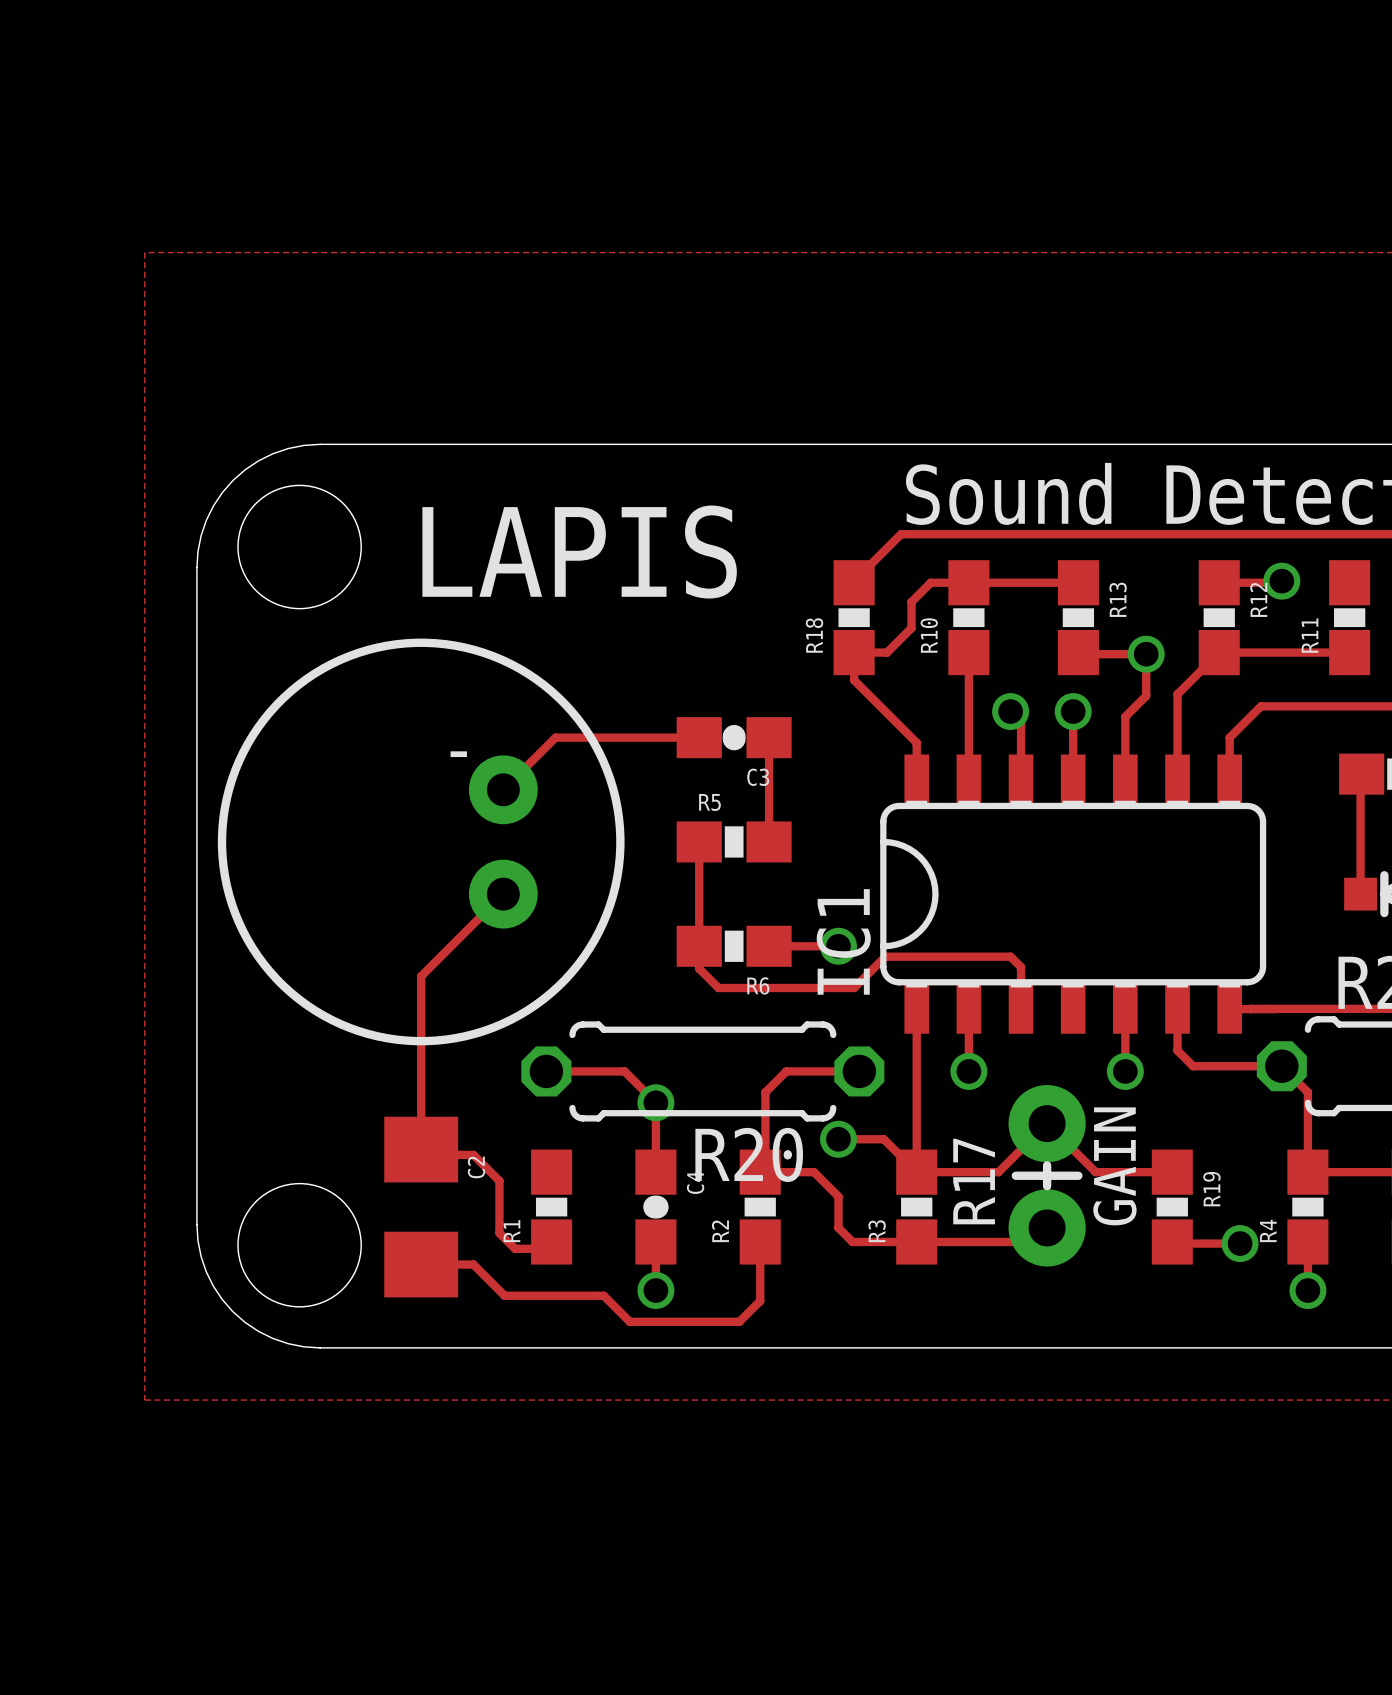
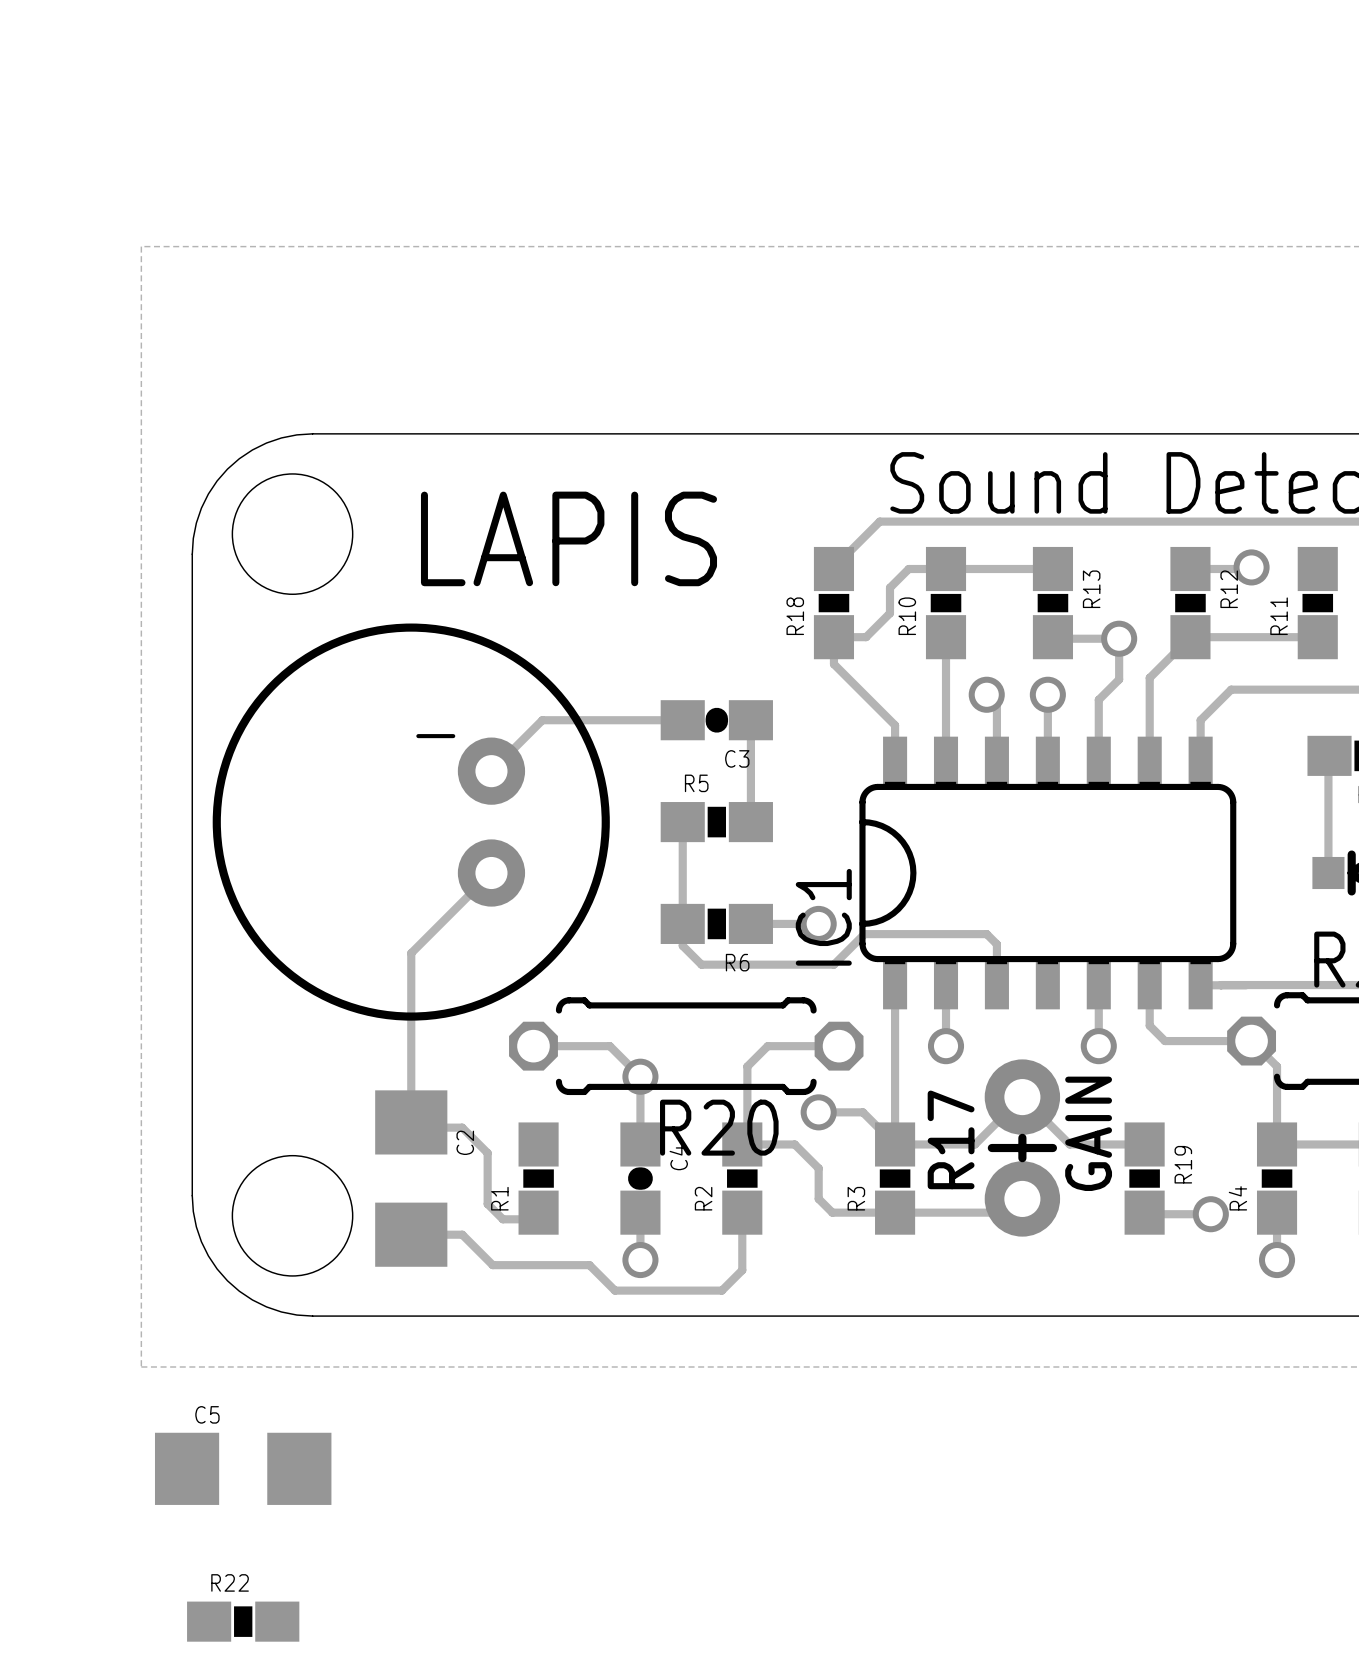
C5: none -> (243, 1468)
R22: none -> (243, 1621)

